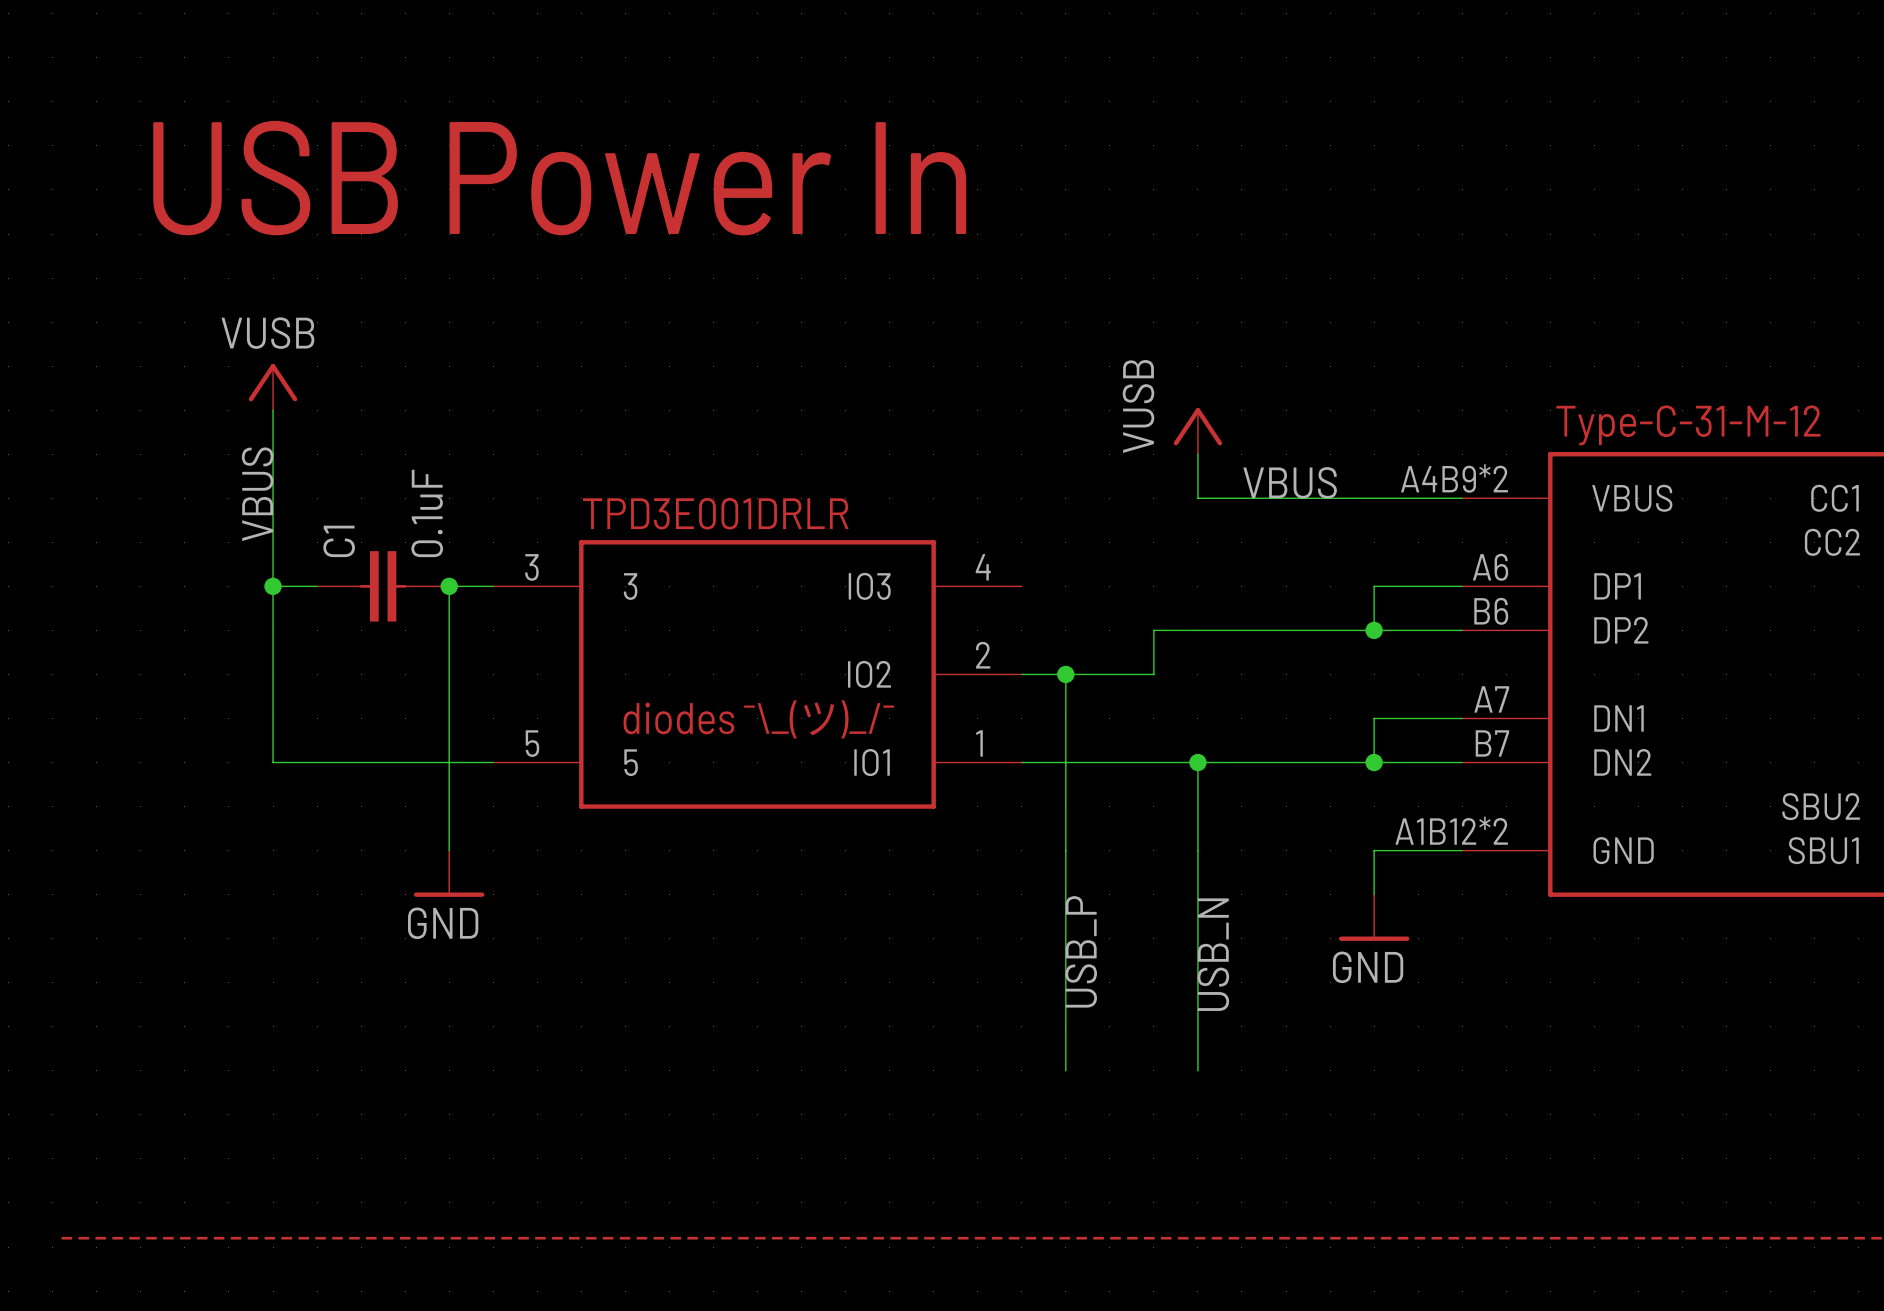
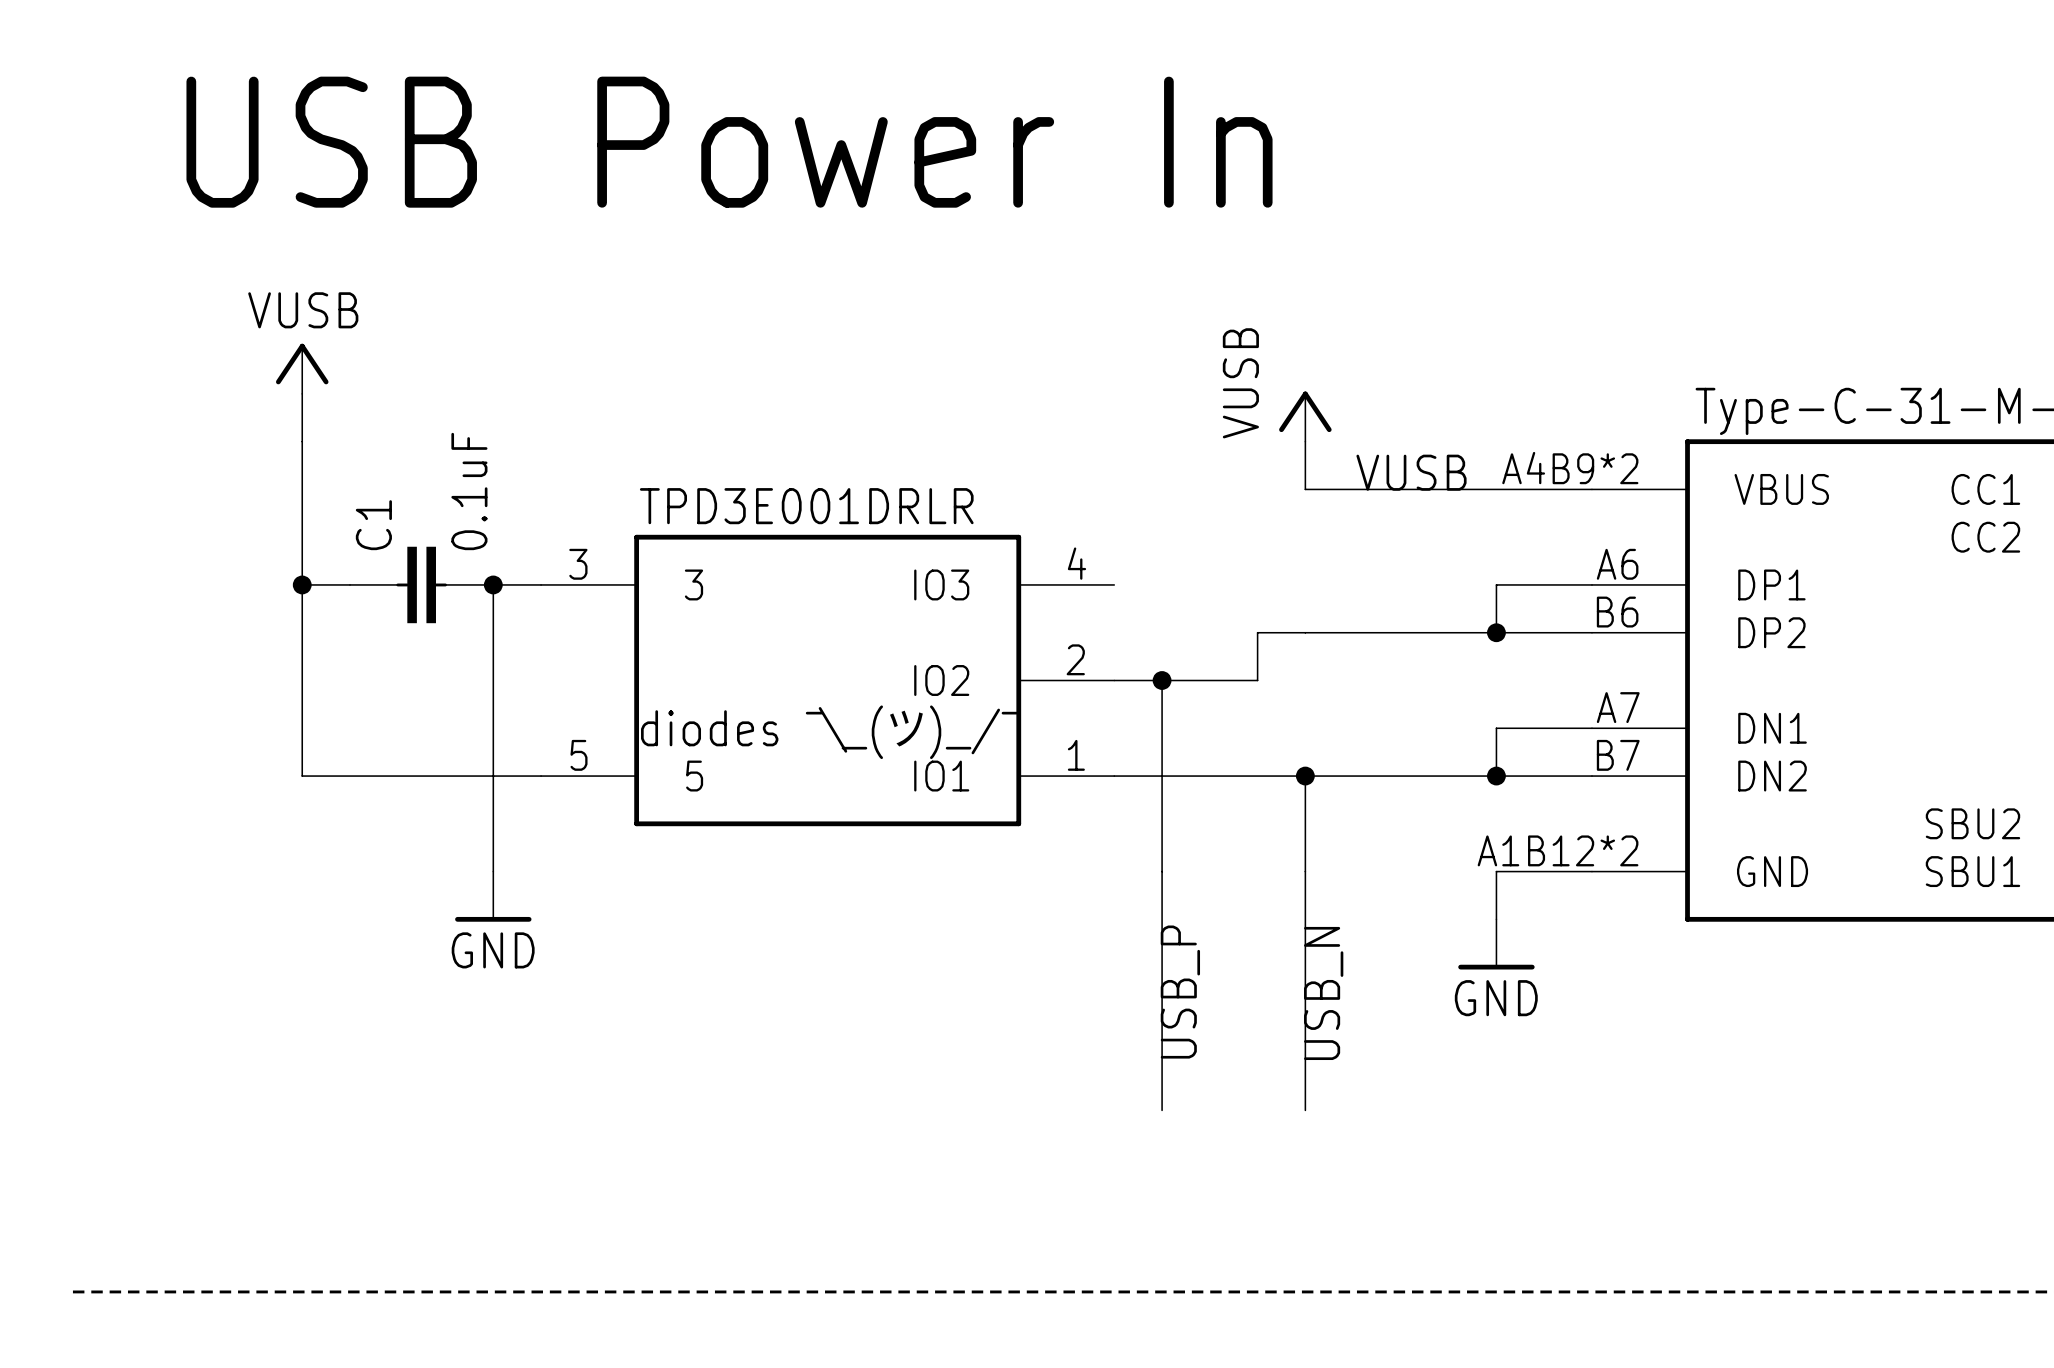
label: VBUS (1290, 482) -> VUSB (1411, 472)
label: VBUS (257, 494) -> none

